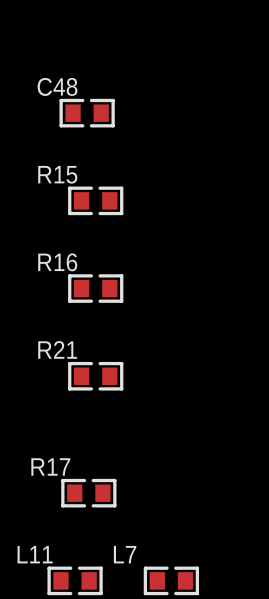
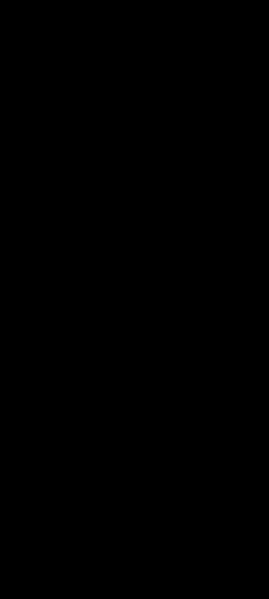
C48: (87, 113) -> none
R15: (95, 200) -> none
R16: (95, 288) -> none
R21: (95, 376) -> none
R17: (88, 493) -> none
L11: (75, 580) -> none
L7: (171, 580) -> none

